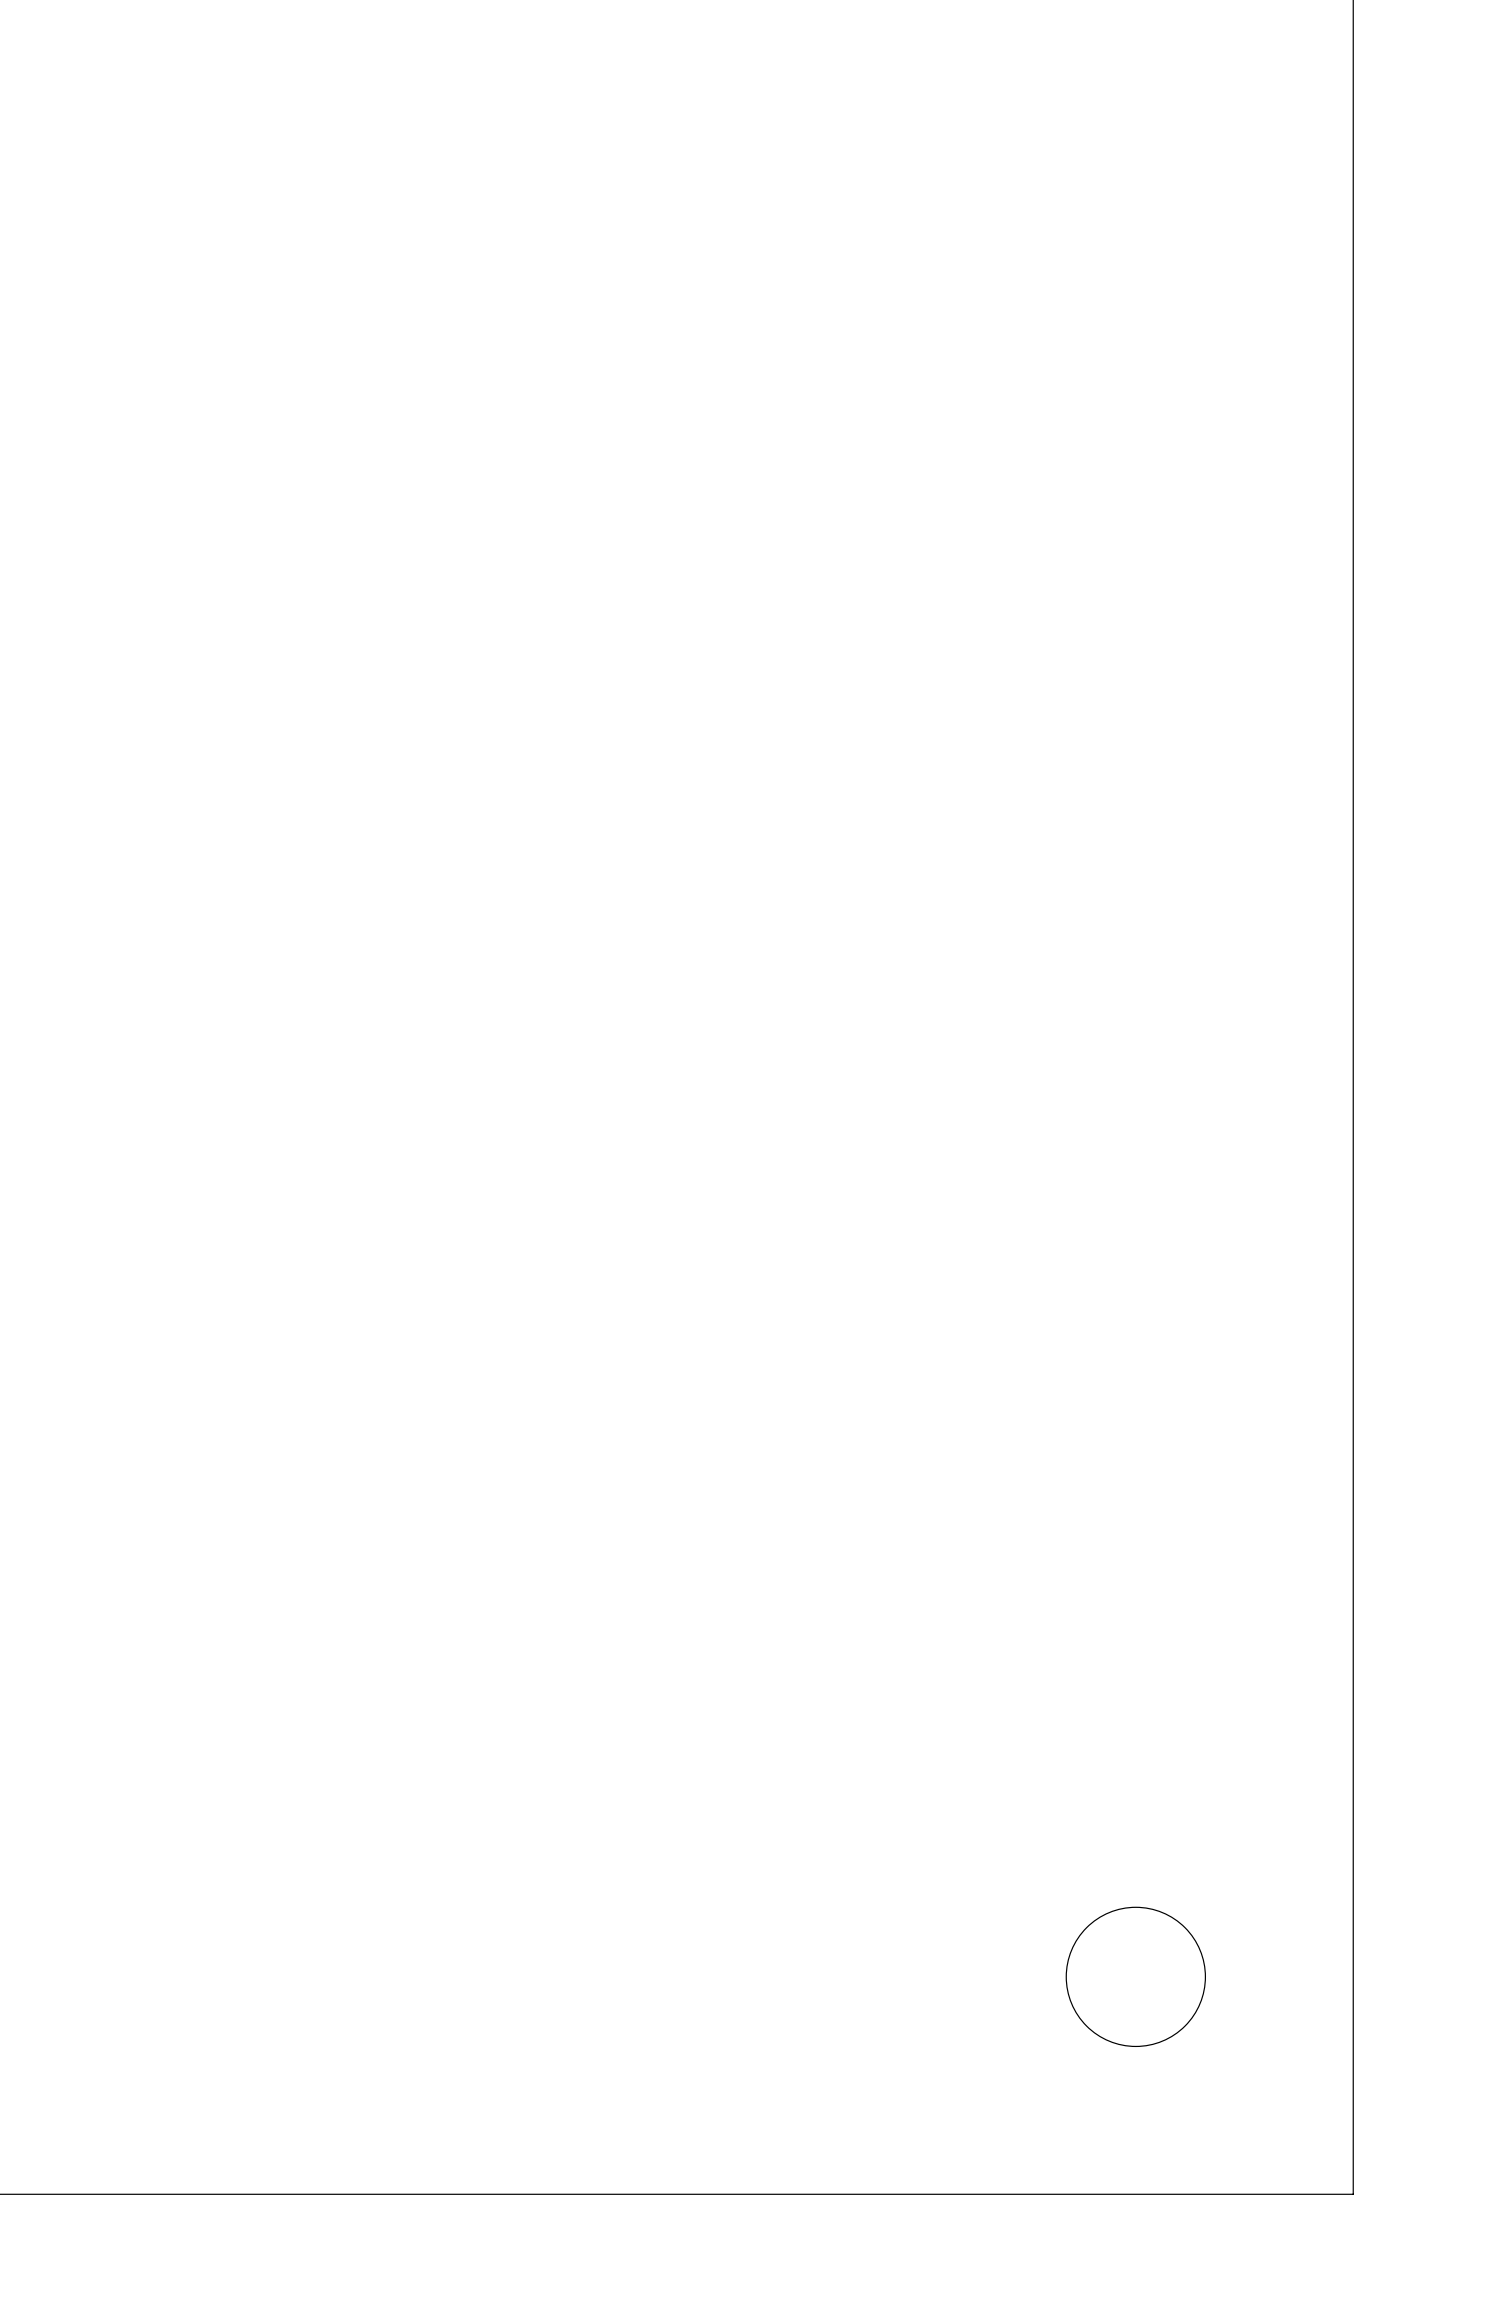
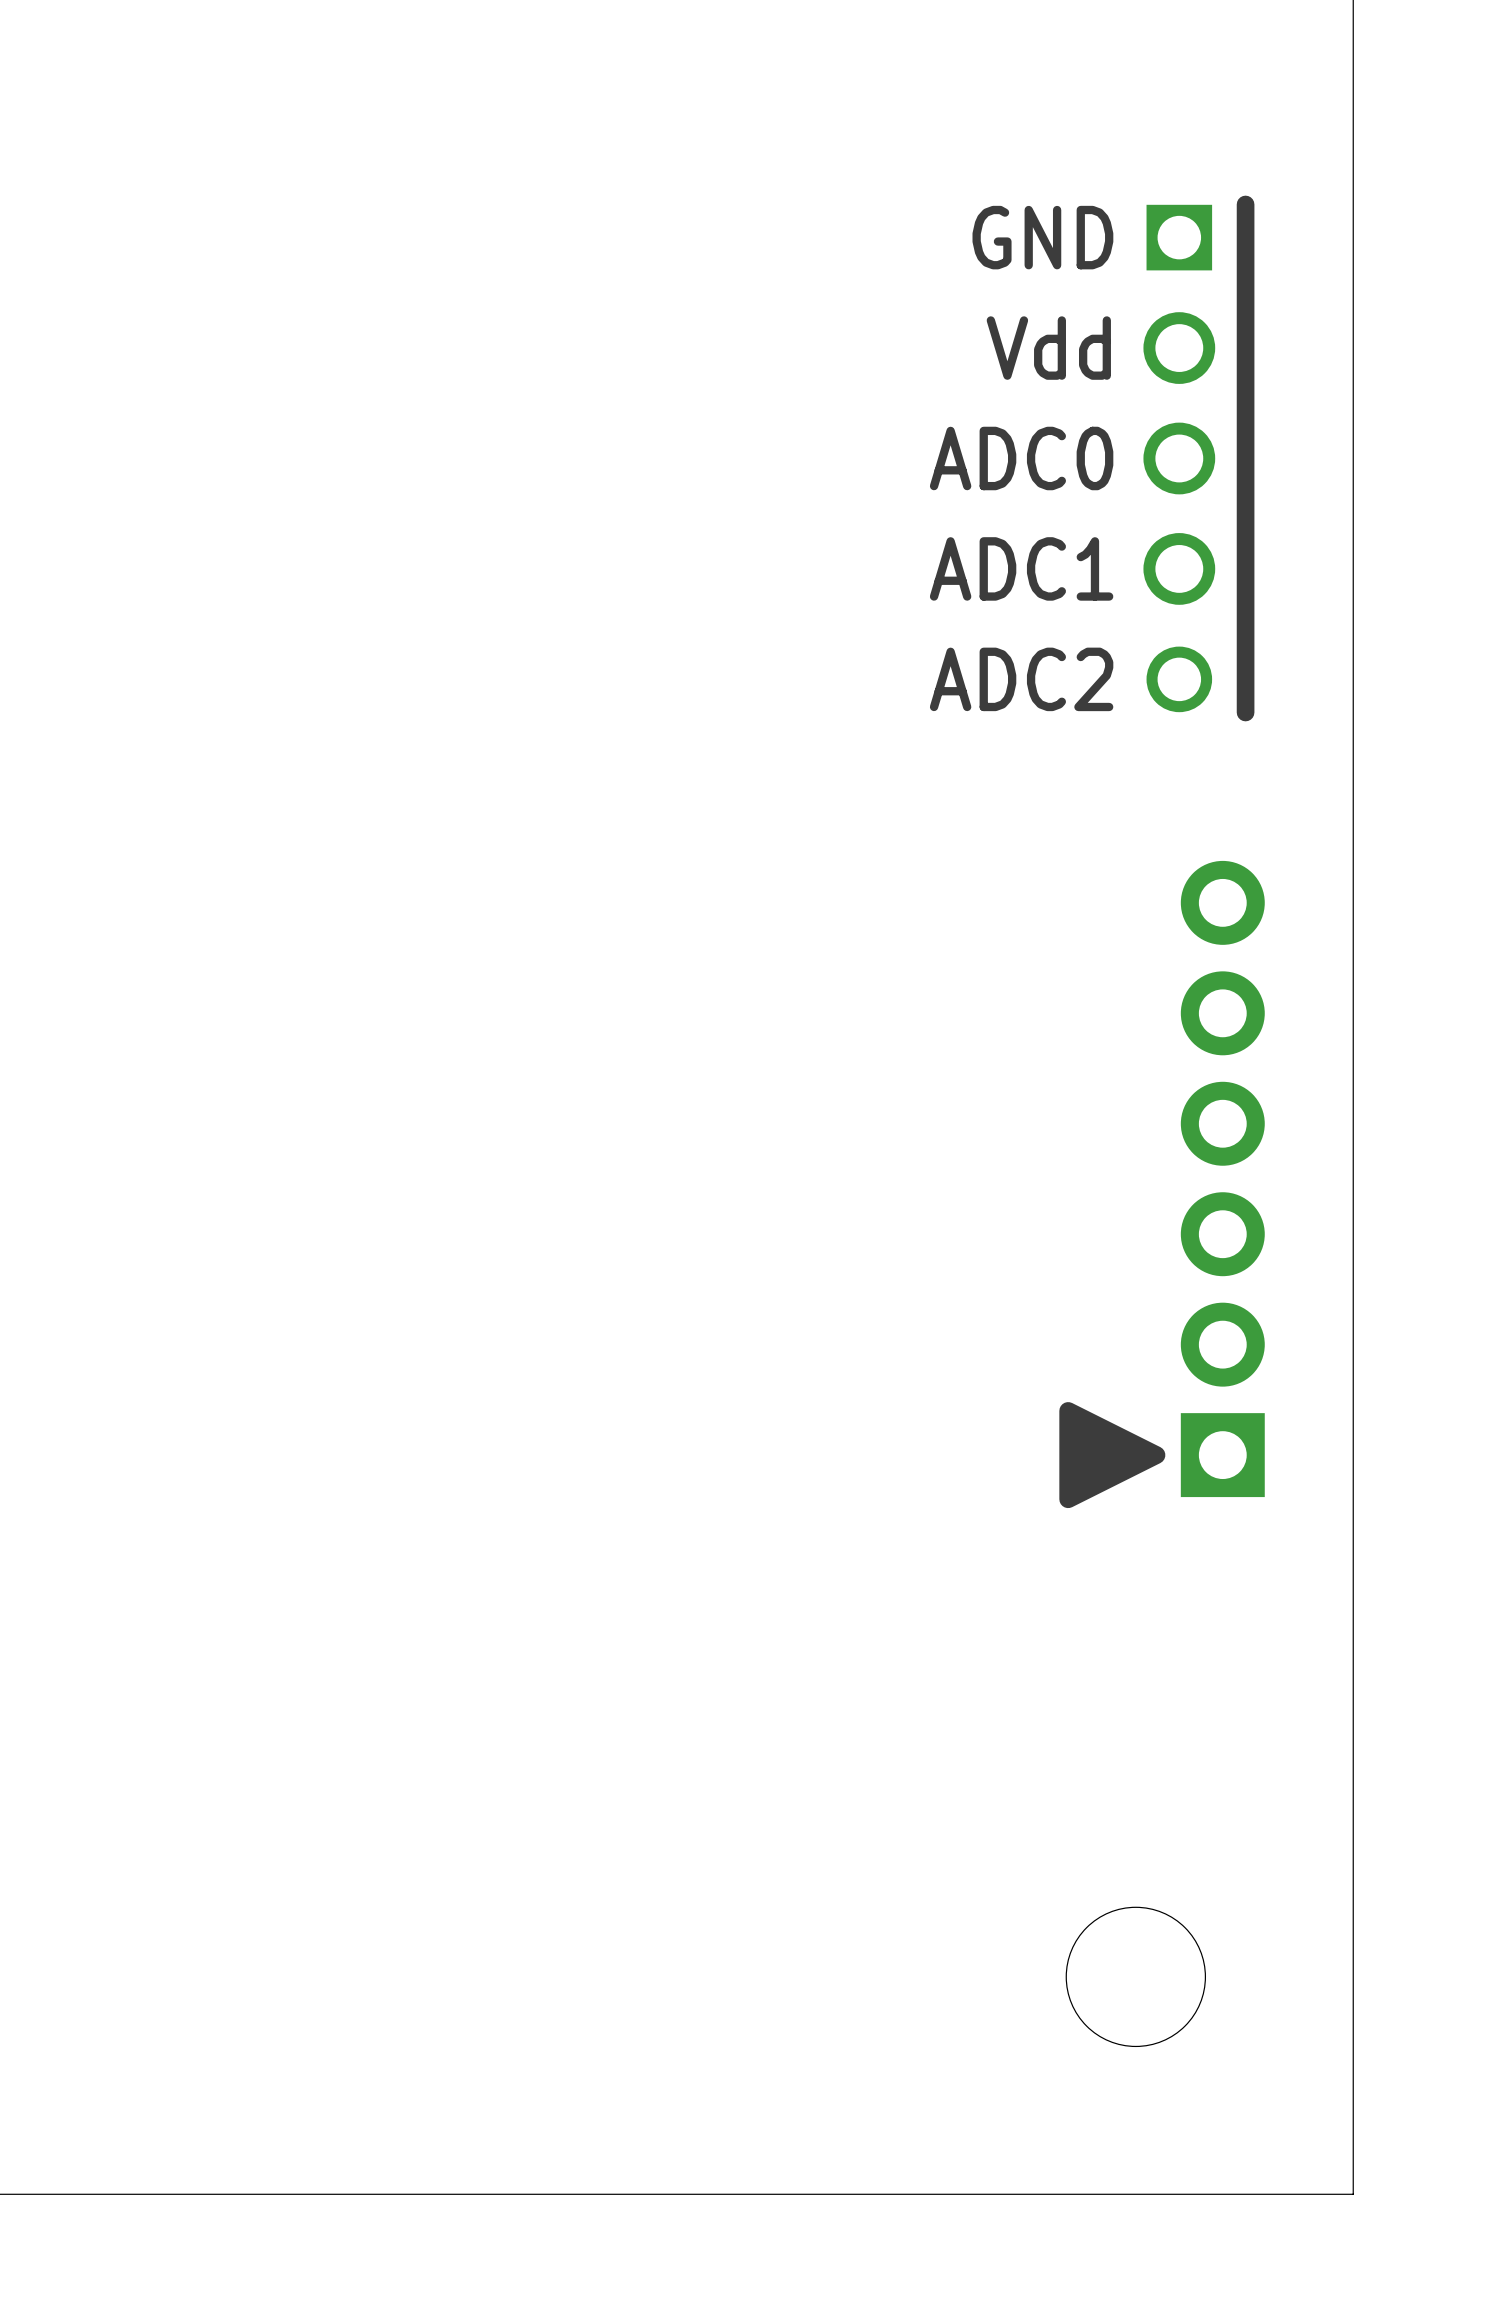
part: none -> (1198, 458)
part: none -> (1162, 1184)

